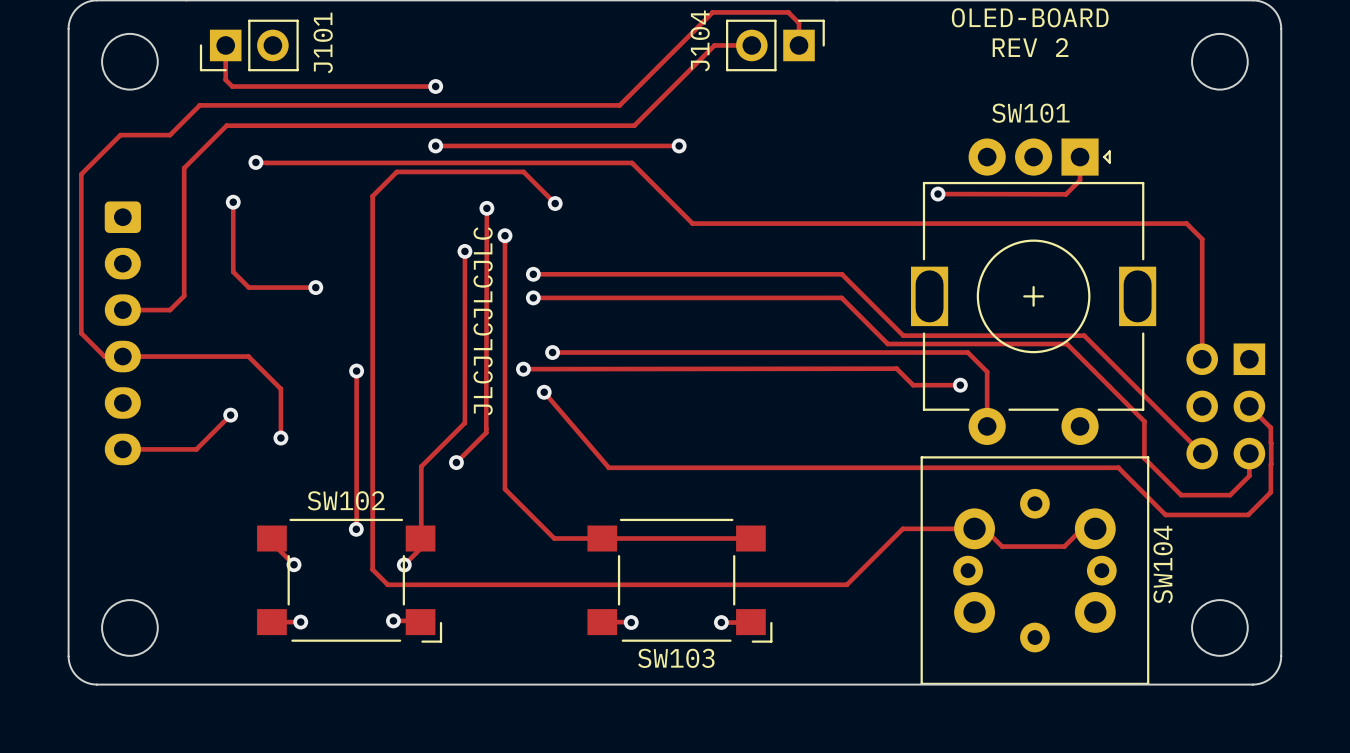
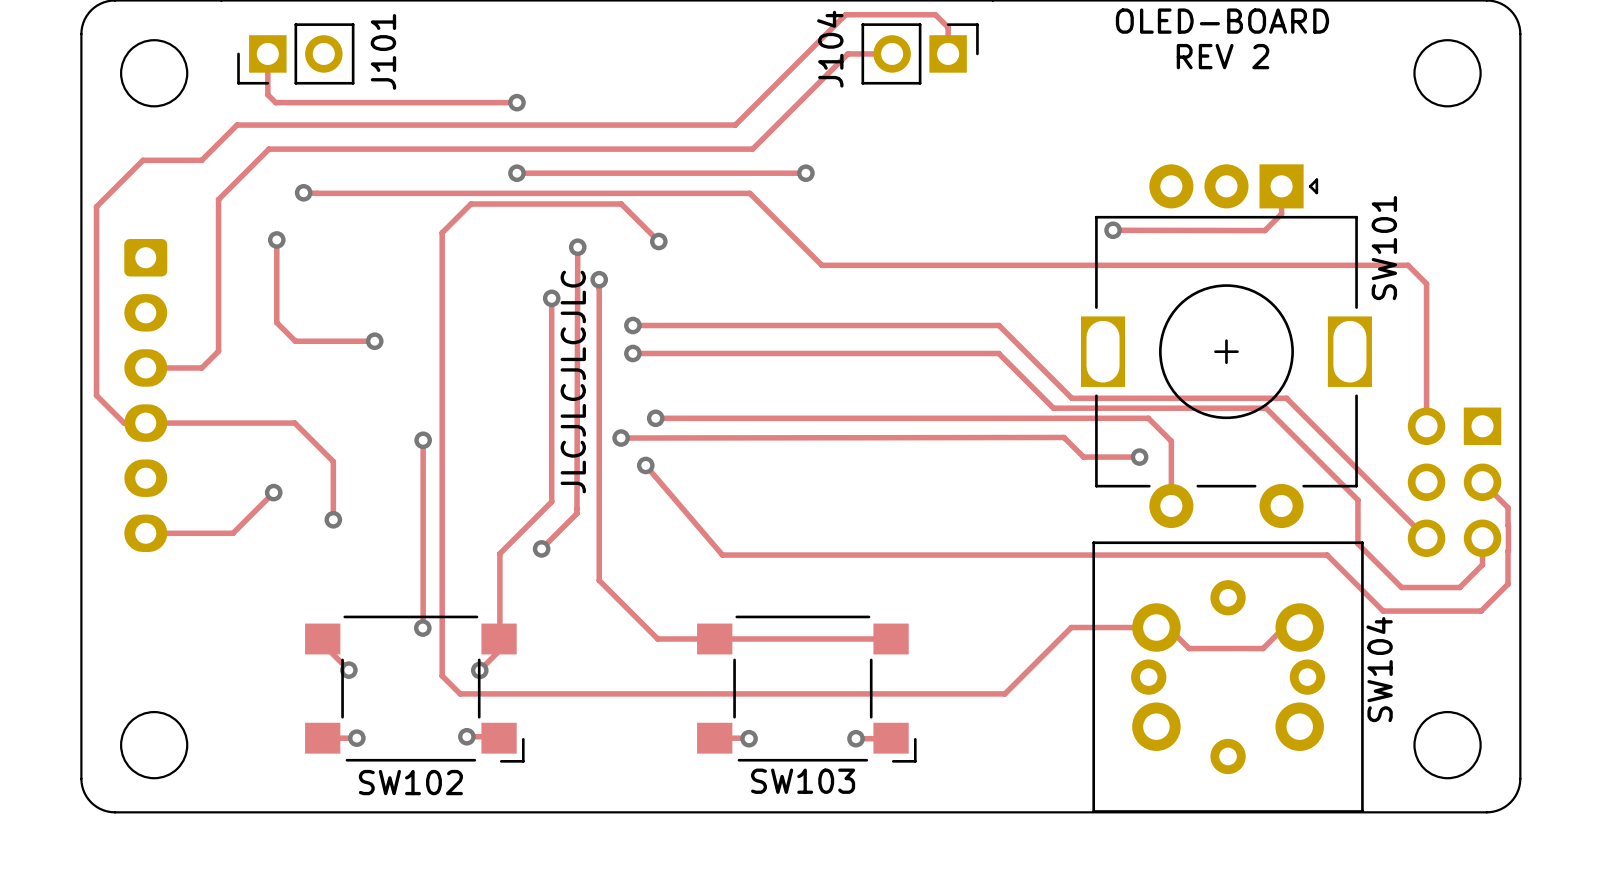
SW101 name rotation: 0° (1030, 113) -> 90° counterclockwise (1384, 248)
SW101 name position: SW101 (1030, 113) -> SW101 (1384, 248)
SW102 name position: SW102 (346, 500) -> SW102 (410, 782)

